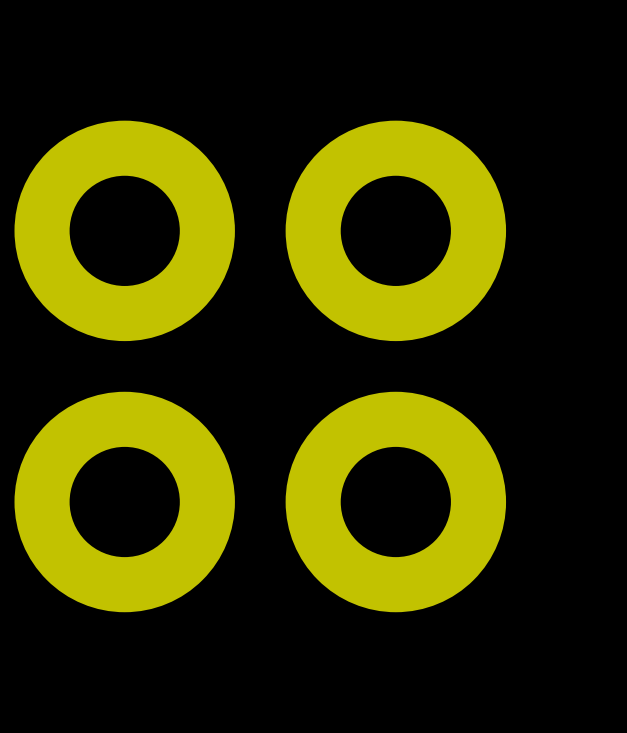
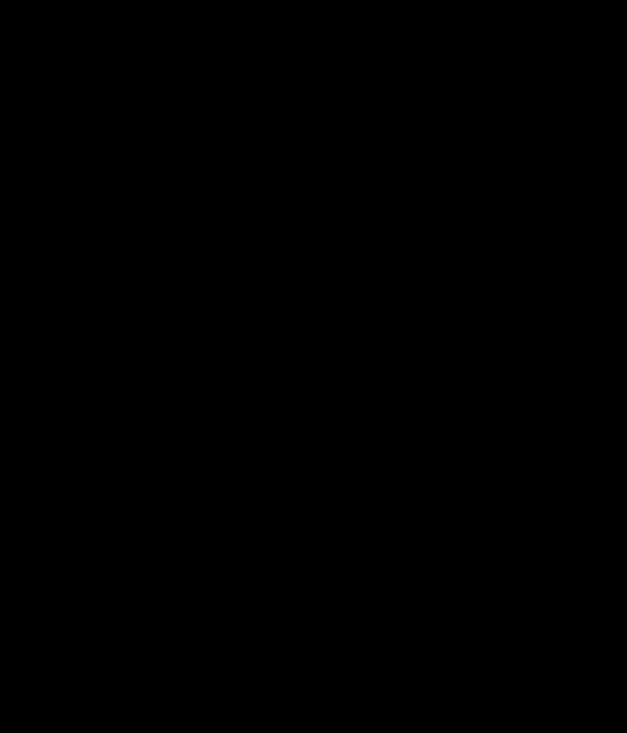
part: (124, 230) -> none
part: (395, 230) -> none
part: (124, 502) -> none
part: (395, 502) -> none

